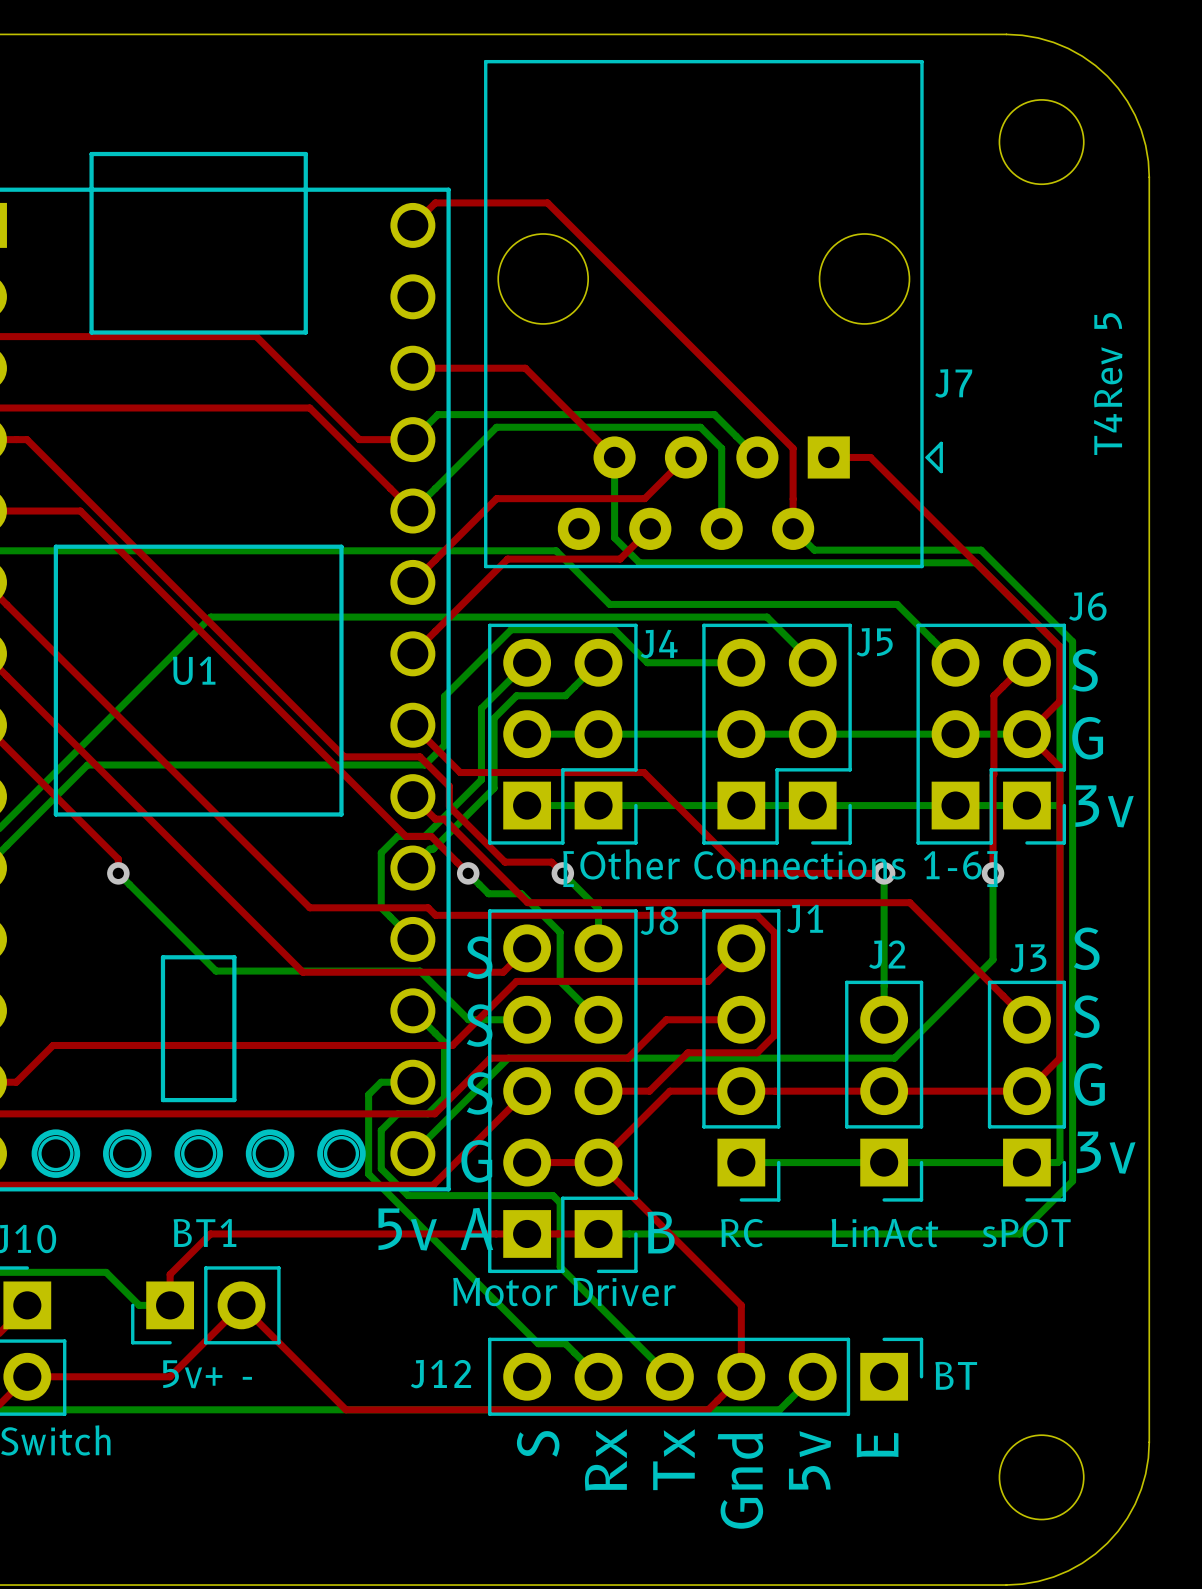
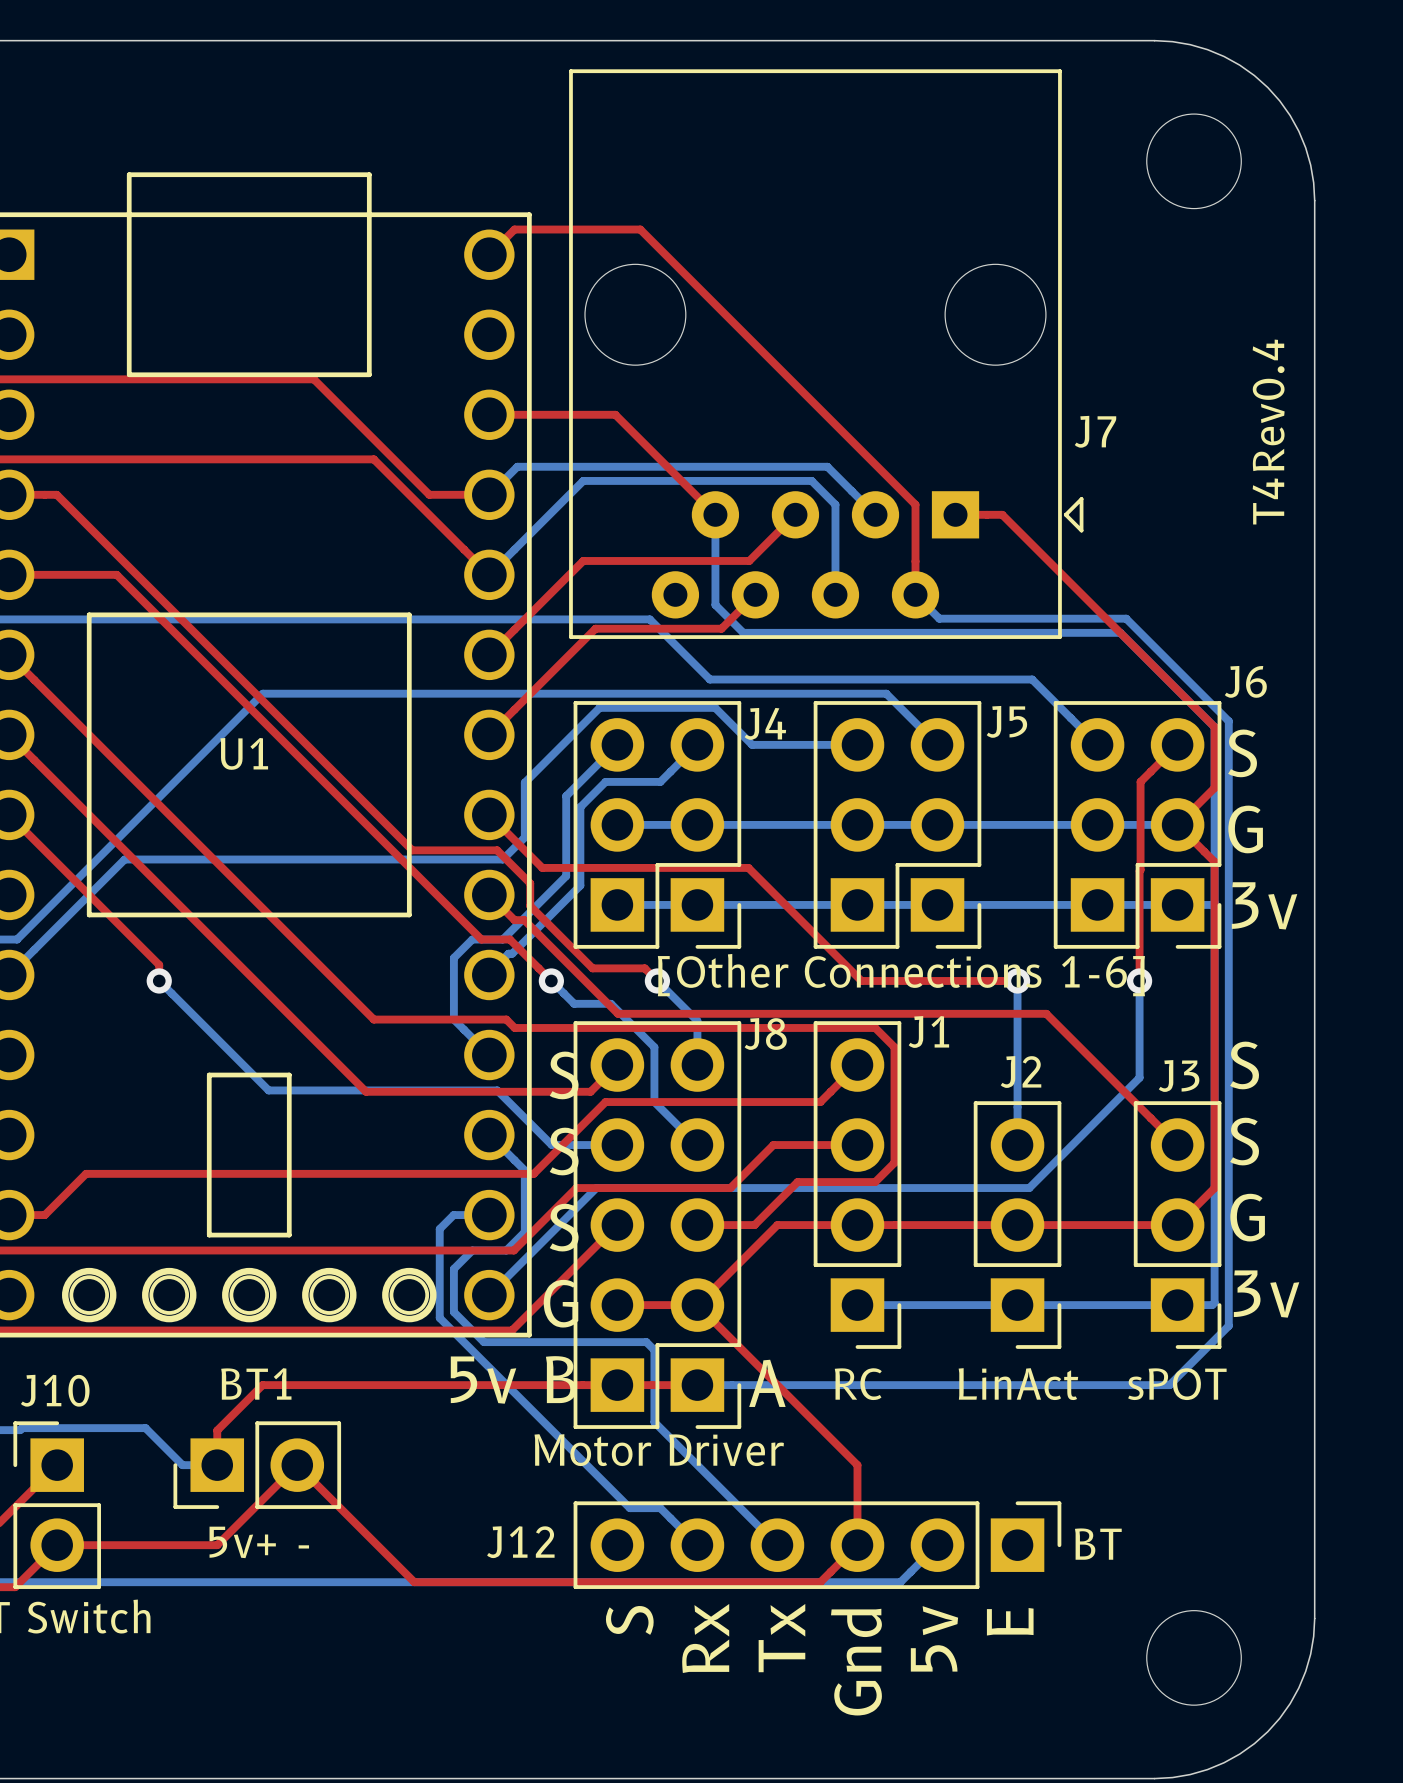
text: T4Rev 5 (1108, 384) -> T4Rev0.4 (1268, 432)
text: 5v A (435, 1229) -> 5v B (513, 1379)
text: B (661, 1232) -> A (767, 1383)

